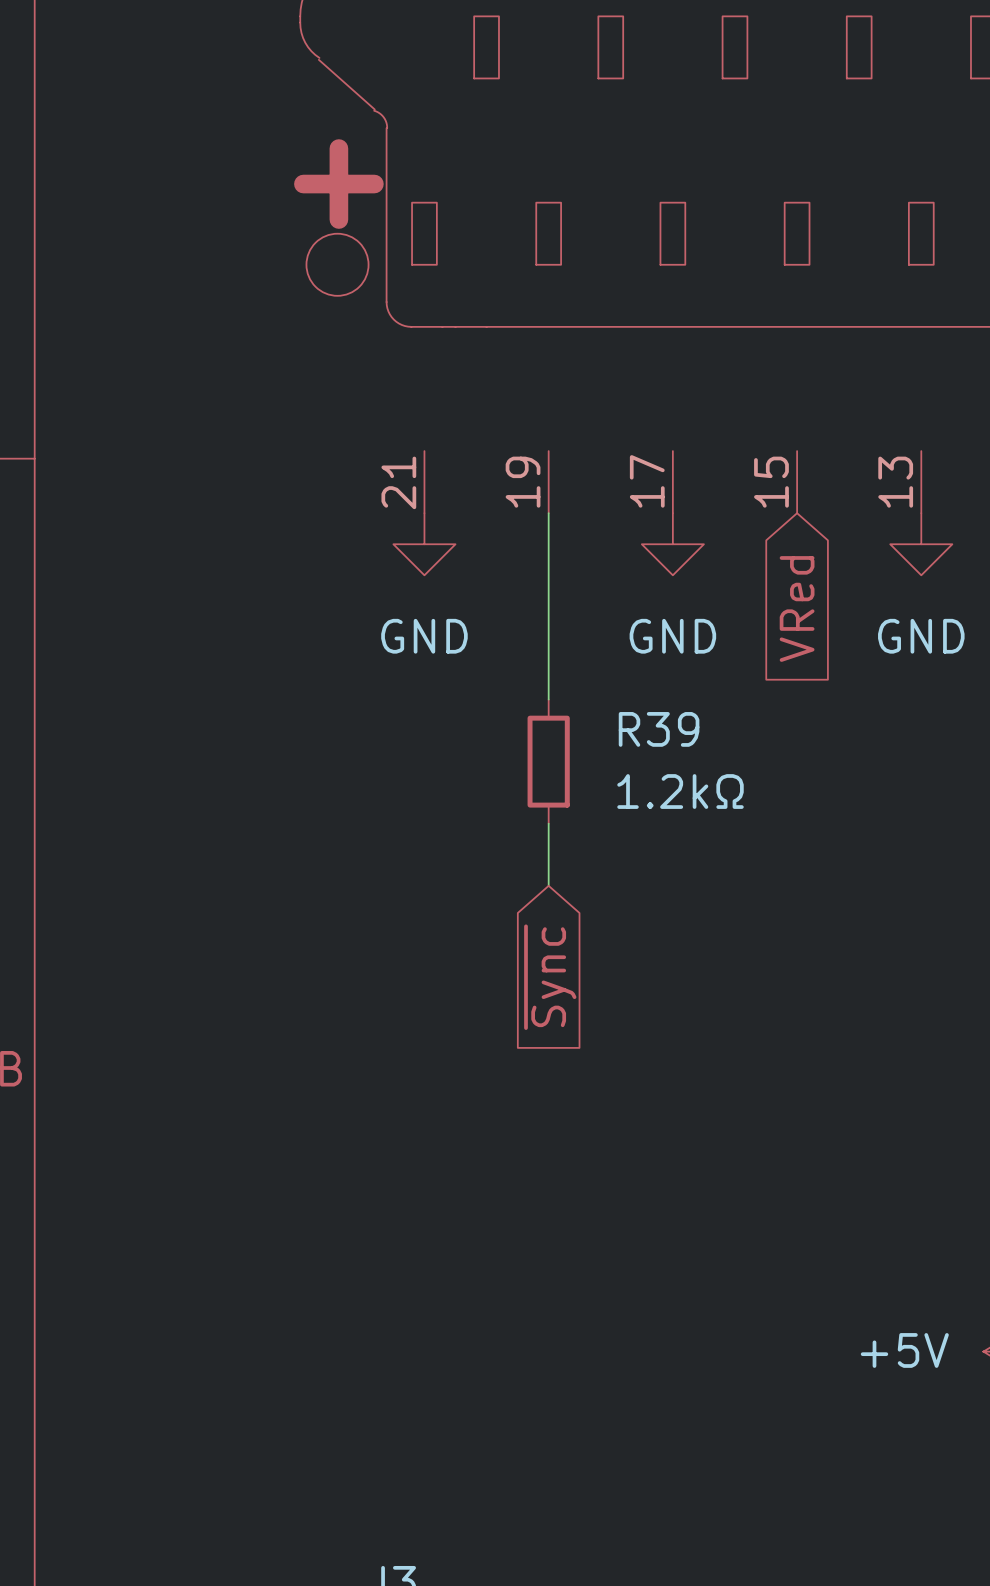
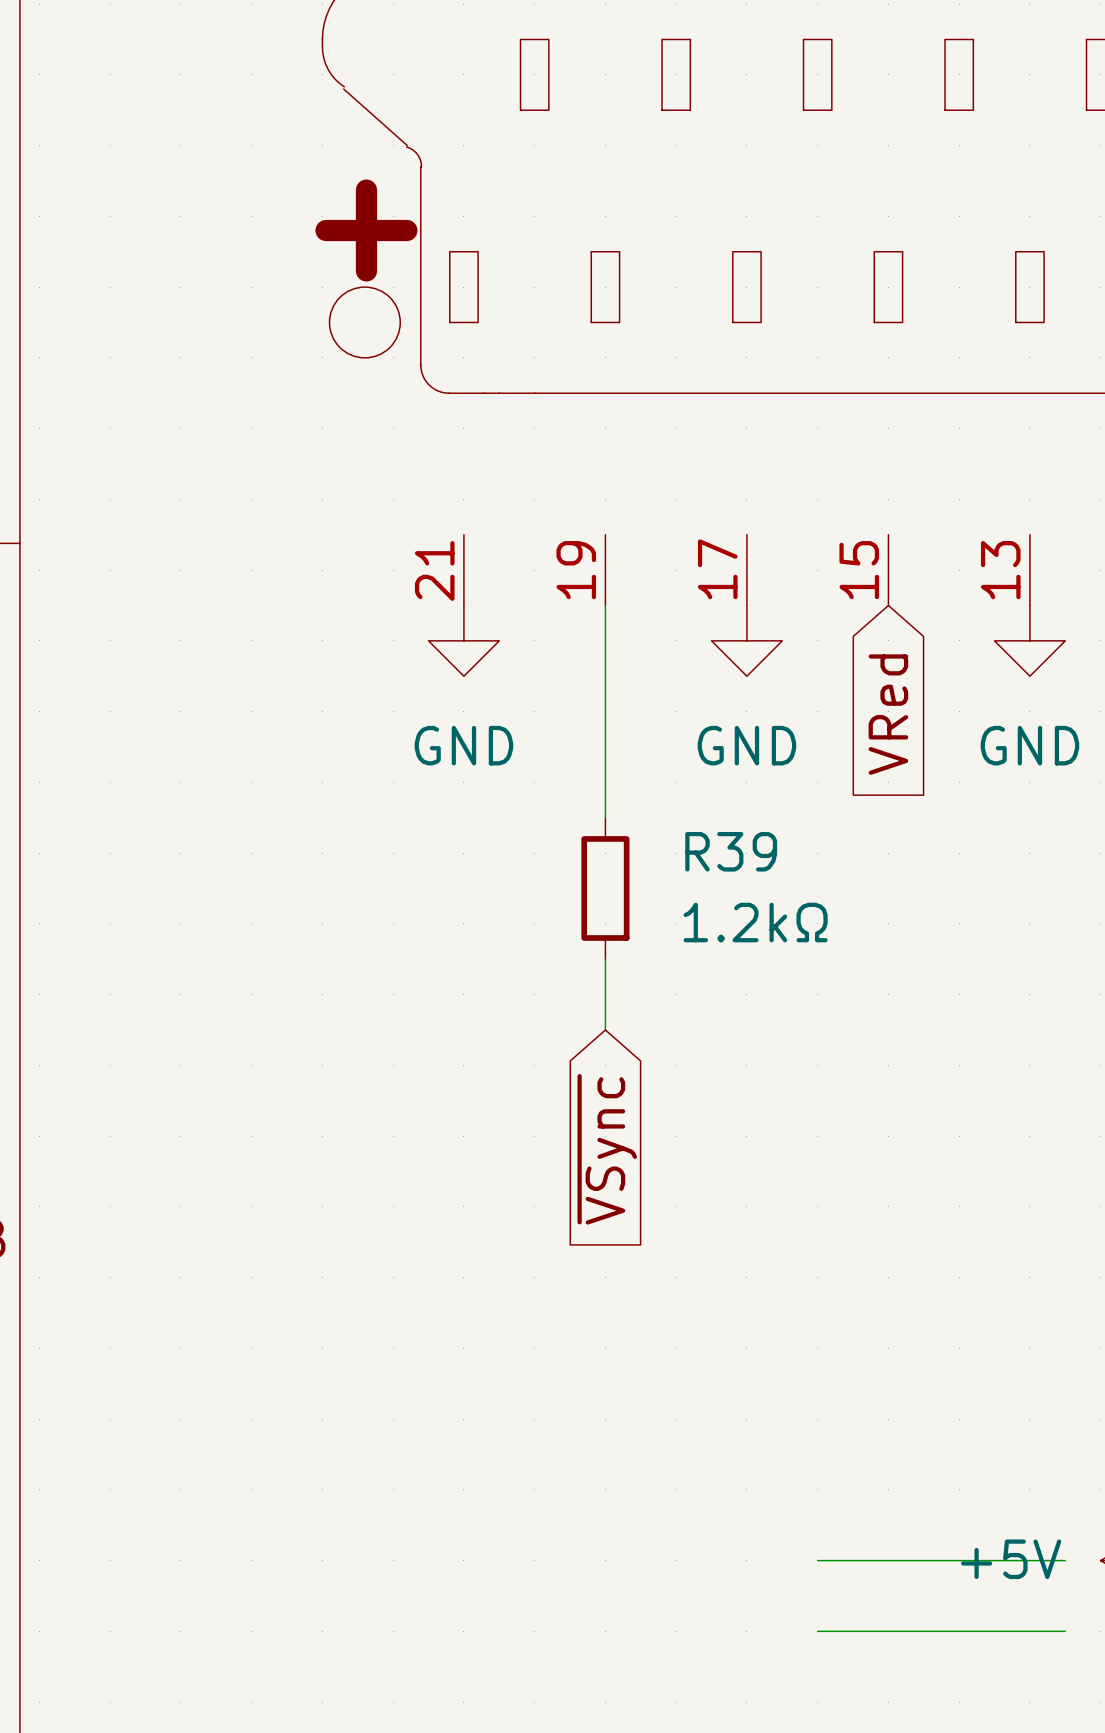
global label: ~{Sync} (550, 977) -> ~{VSync} (607, 1149)
wire: none -> (817, 1560) (1065, 1560)
wire: none -> (817, 1631) (1065, 1631)

